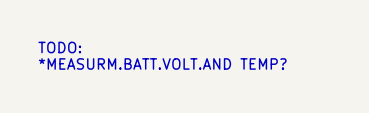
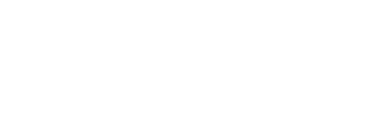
text: TODO: (59, 47) -> none
text: *MEASURM.BATT.VOLT.AND TEMP? (162, 63) -> none

